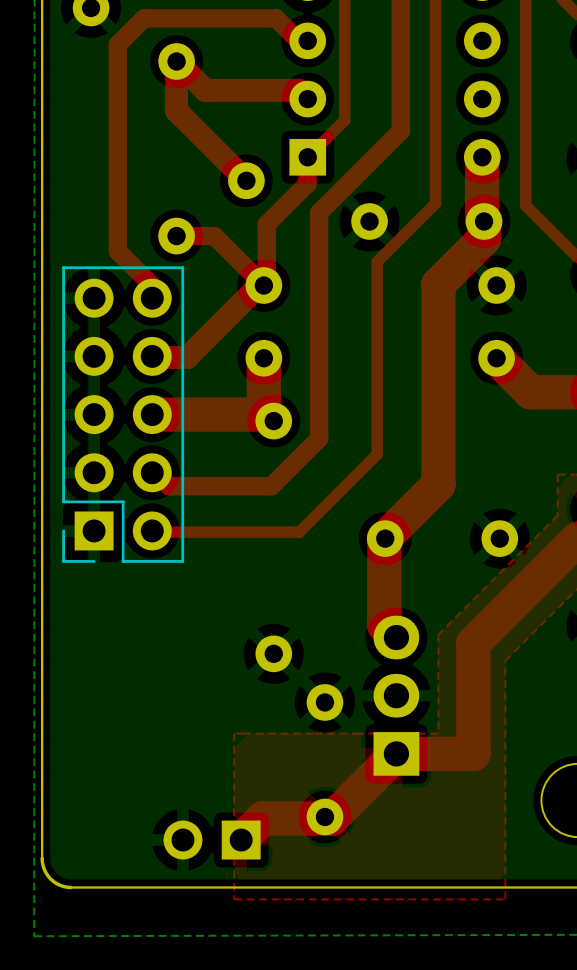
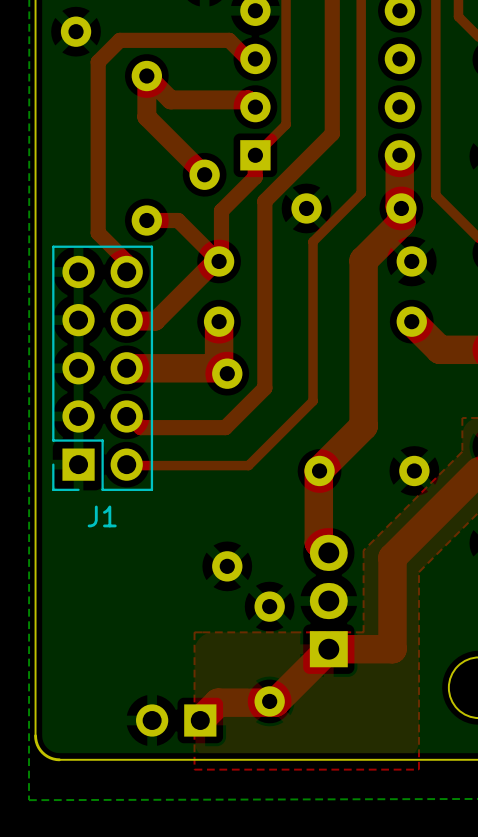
J1 name: none -> J1 (102, 516)

